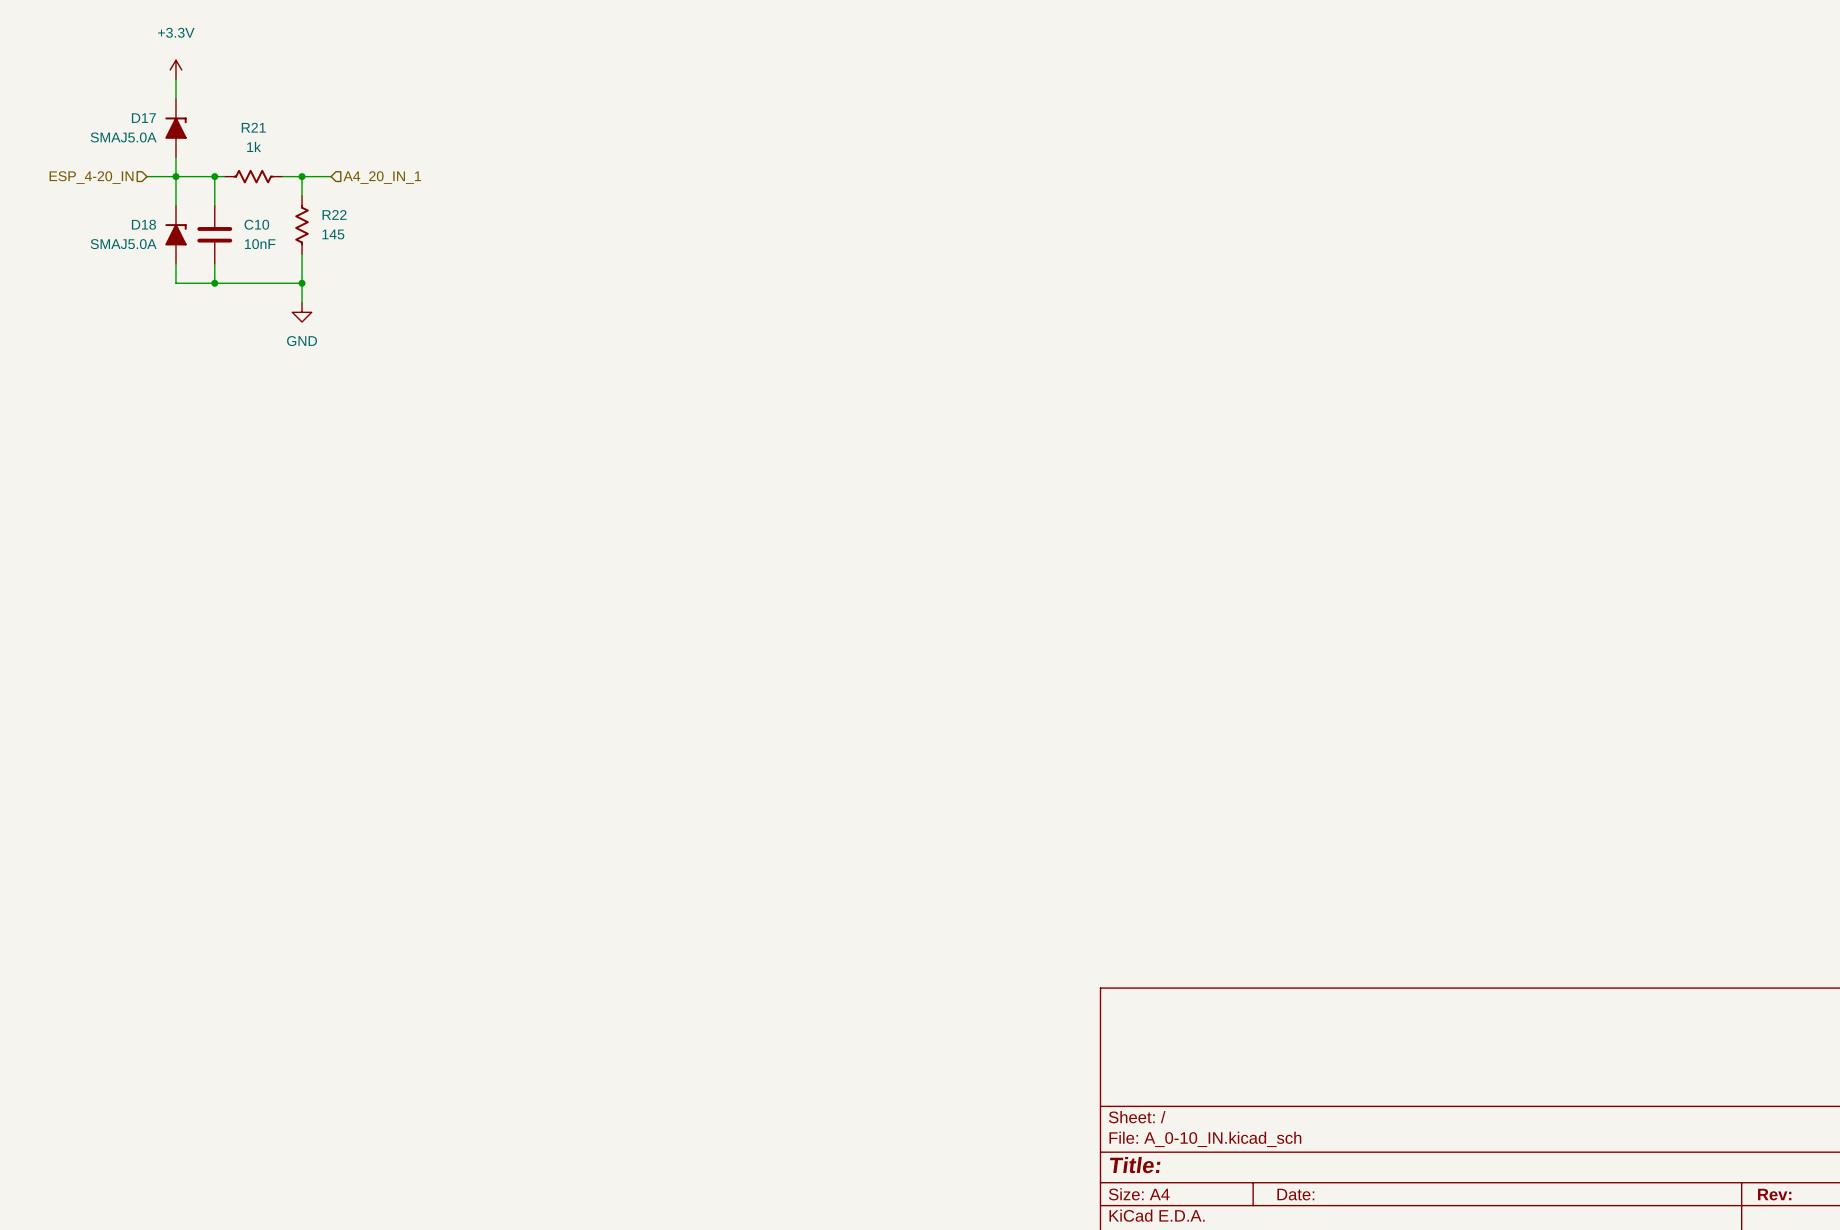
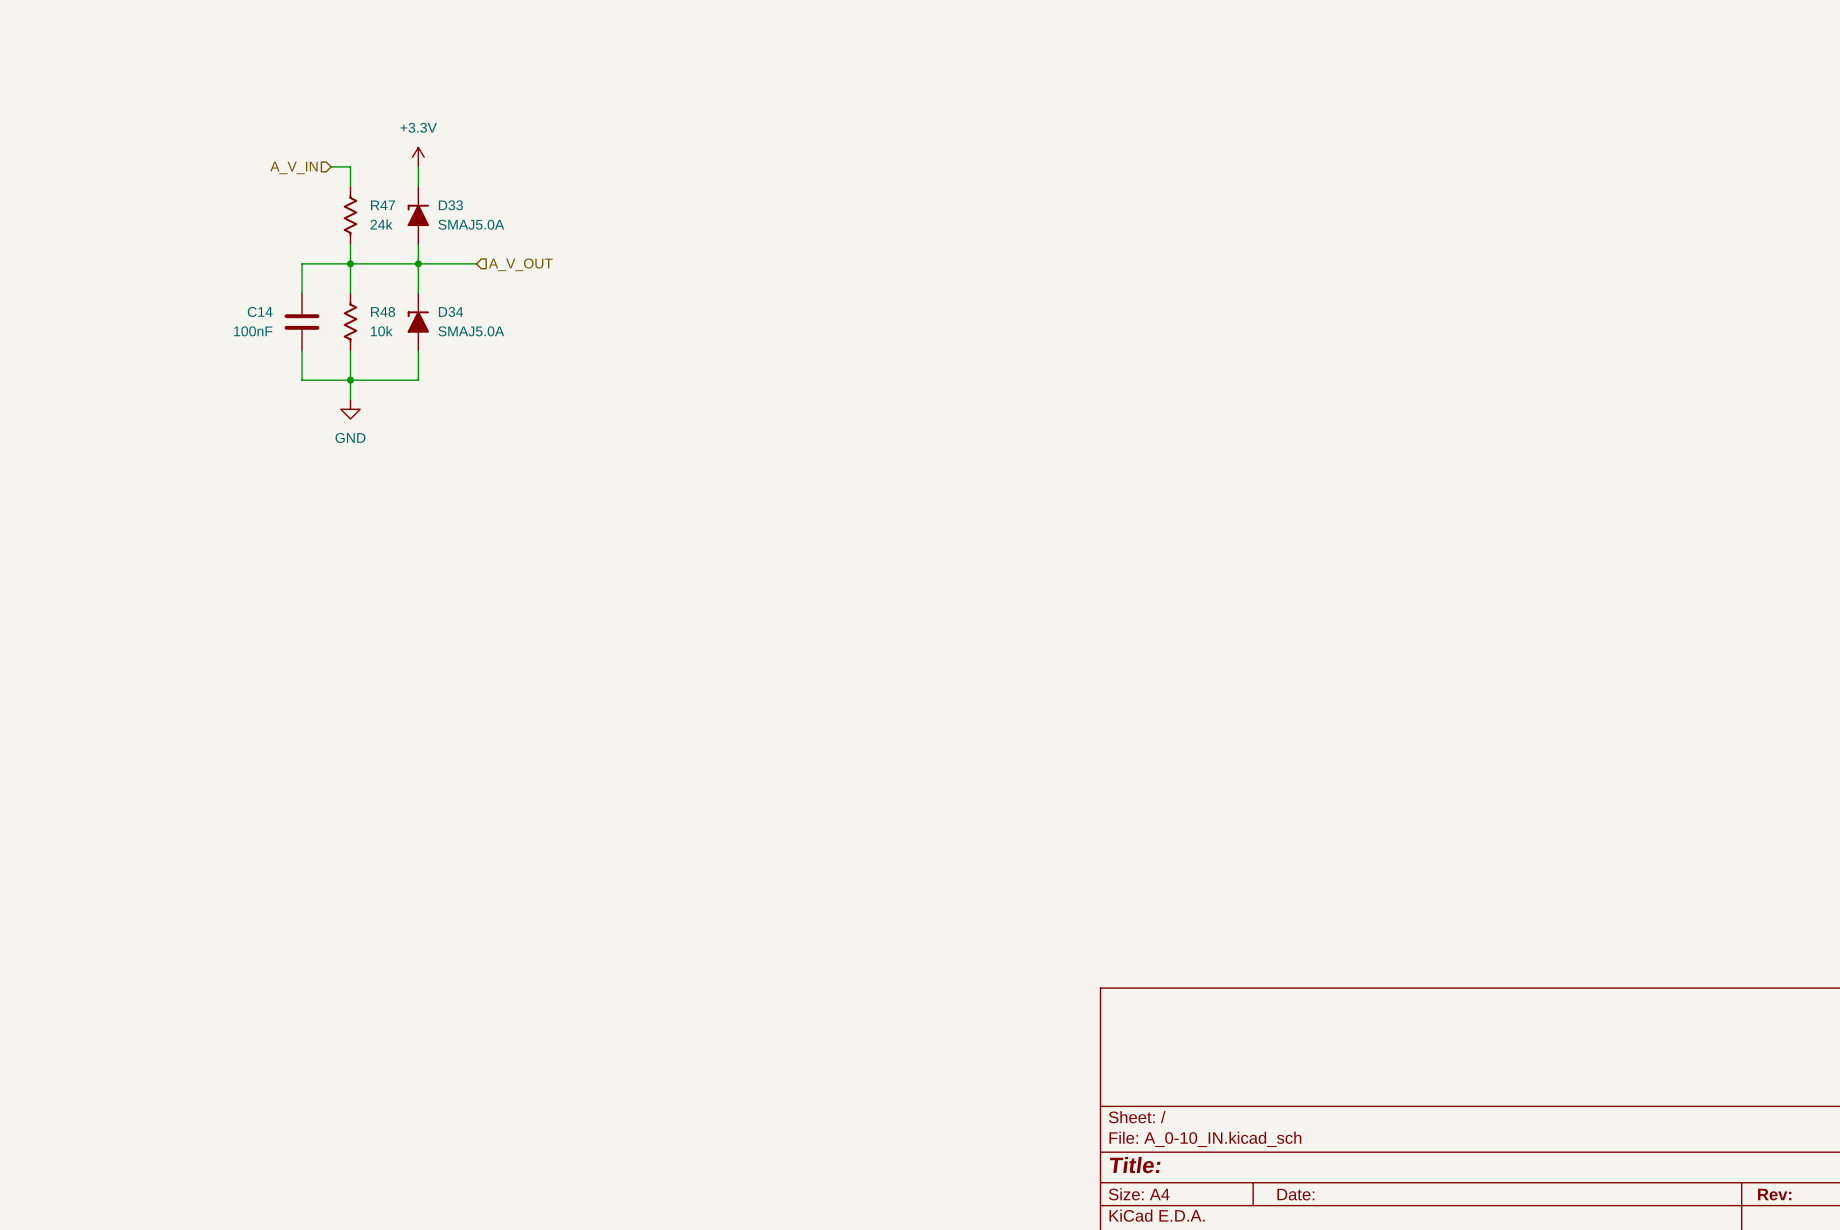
power symbol: +3.3V (175, 69) -> none
wire: (175, 79) (175, 99) -> none
D17: SMAJ5.0A (175, 128) -> none
wire: (175, 157) (175, 205) -> none
power symbol: none -> +3.3V (418, 157)
wire: none -> (331, 166) (350, 166) (350, 186)
hierarchical label: none -> A_V_IN (293, 167)
wire: (146, 176) (224, 176) -> none
junction: (175, 176) -> none
wire: (214, 176) (214, 205) -> none
junction: (214, 176) -> none
R21: 1k (253, 176) -> none
wire: (282, 176) (331, 176) -> none
wire: (302, 176) (302, 196) -> (418, 166) (418, 186)
junction: (302, 176) -> none
hierarchical label: ESP_4-20_IN (91, 177) -> none
hierarchical label: A4_20_IN_1 (382, 177) -> none
R47: none -> 24k (350, 215)
D33: none -> SMAJ5.0A (418, 215)
R22: 145 (302, 225) -> none
D18: SMAJ5.0A (175, 234) -> none
C10: 10nF (214, 234) -> none
wire: none -> (350, 244) (350, 292)
wire: none -> (418, 244) (418, 292)
wire: (302, 254) (302, 263) -> (476, 263) (302, 263)
wire: (175, 263) (175, 283) (302, 283) -> none
wire: (214, 263) (214, 283) -> none
junction: none -> (350, 263)
junction: none -> (418, 263)
hierarchical label: none -> A_V_OUT (520, 264)
junction: (214, 283) -> none
junction: (302, 283) -> none
power symbol position: GND (302, 312) -> GND (350, 409)
C14: none -> 100nF (302, 322)
R48: none -> 10k (350, 322)
D34: none -> SMAJ5.0A (418, 322)
wire: none -> (302, 351) (302, 380) (418, 380) (418, 351)
wire: none -> (350, 351) (350, 399)
junction: none -> (350, 380)

